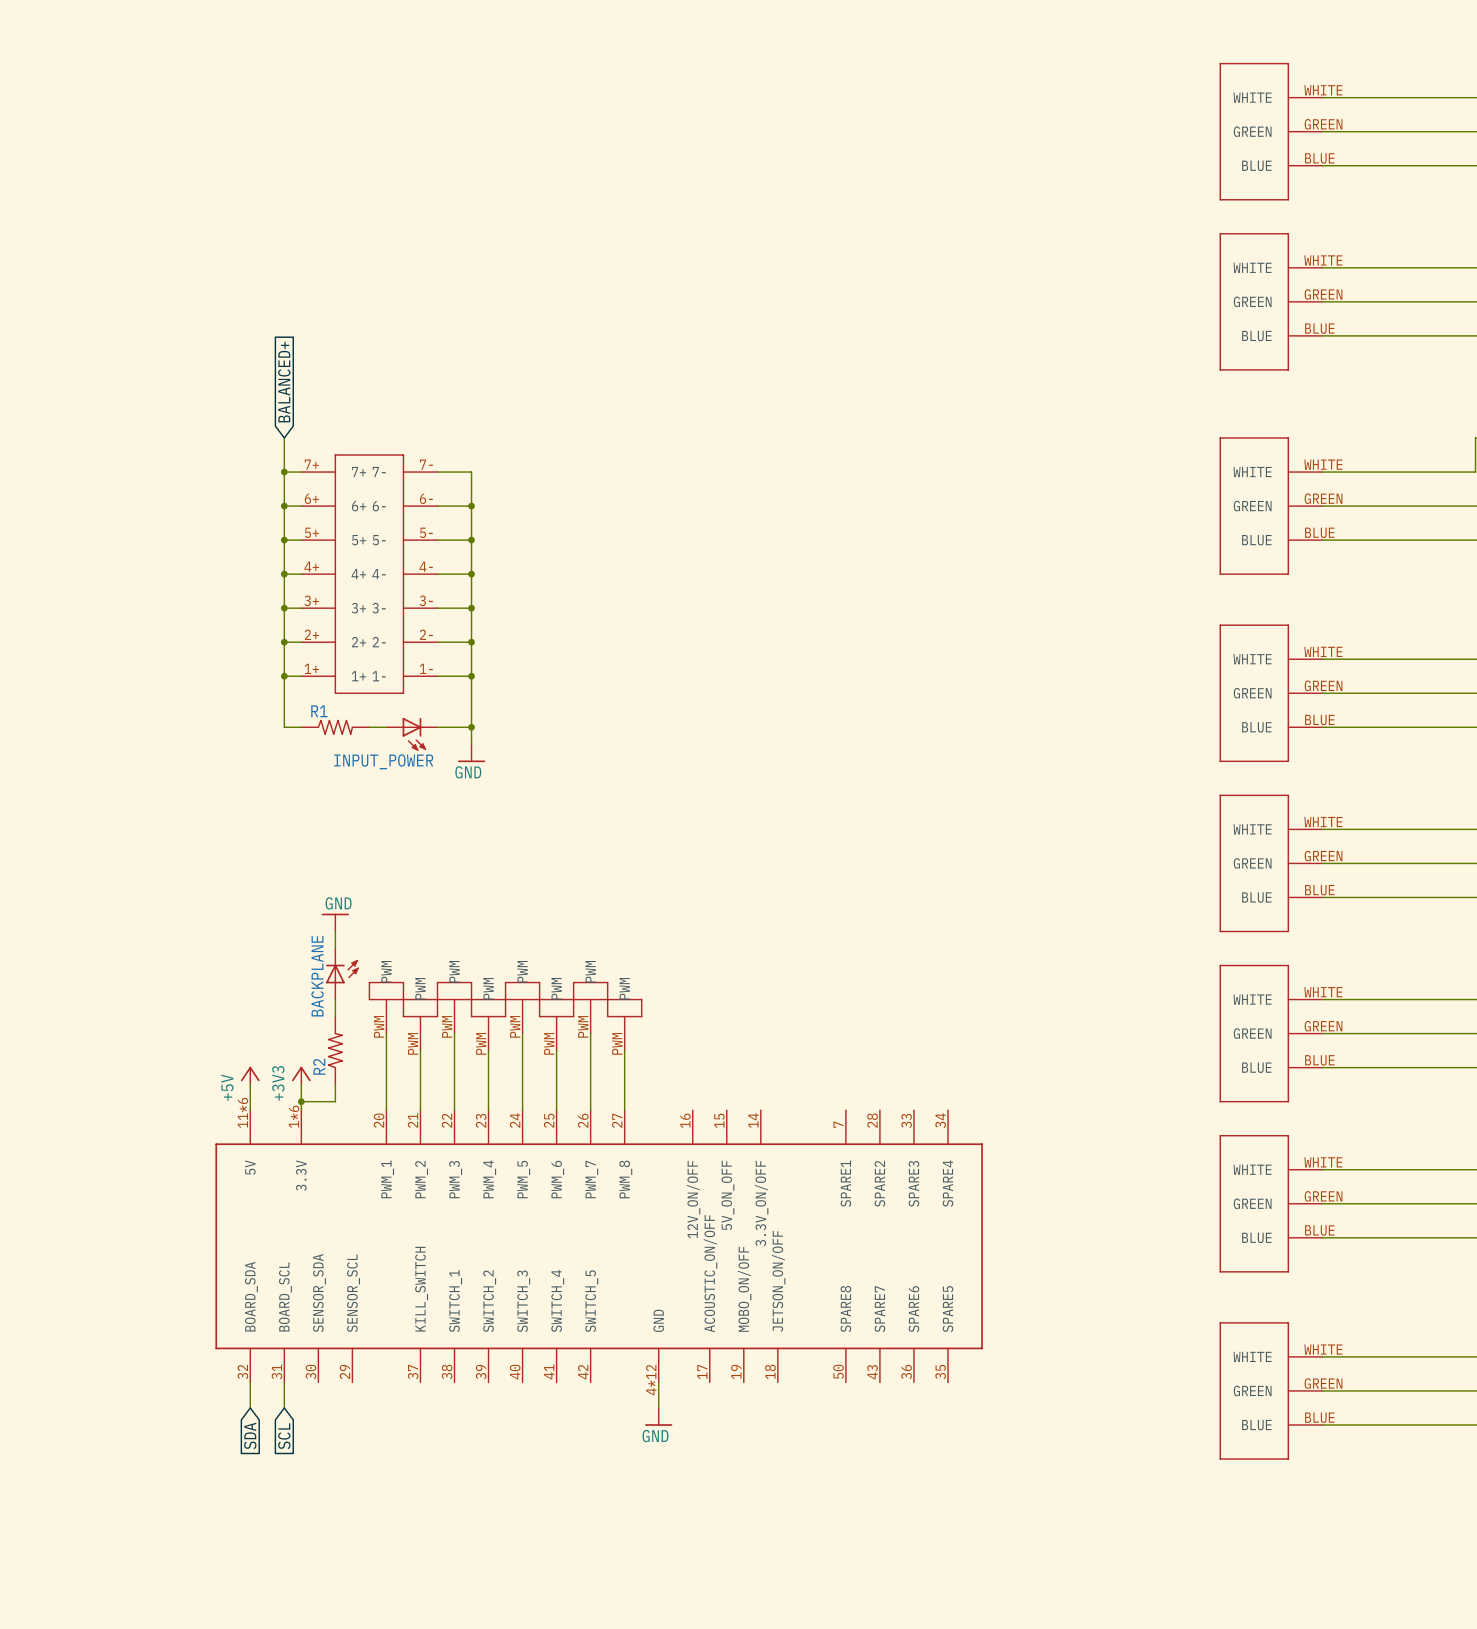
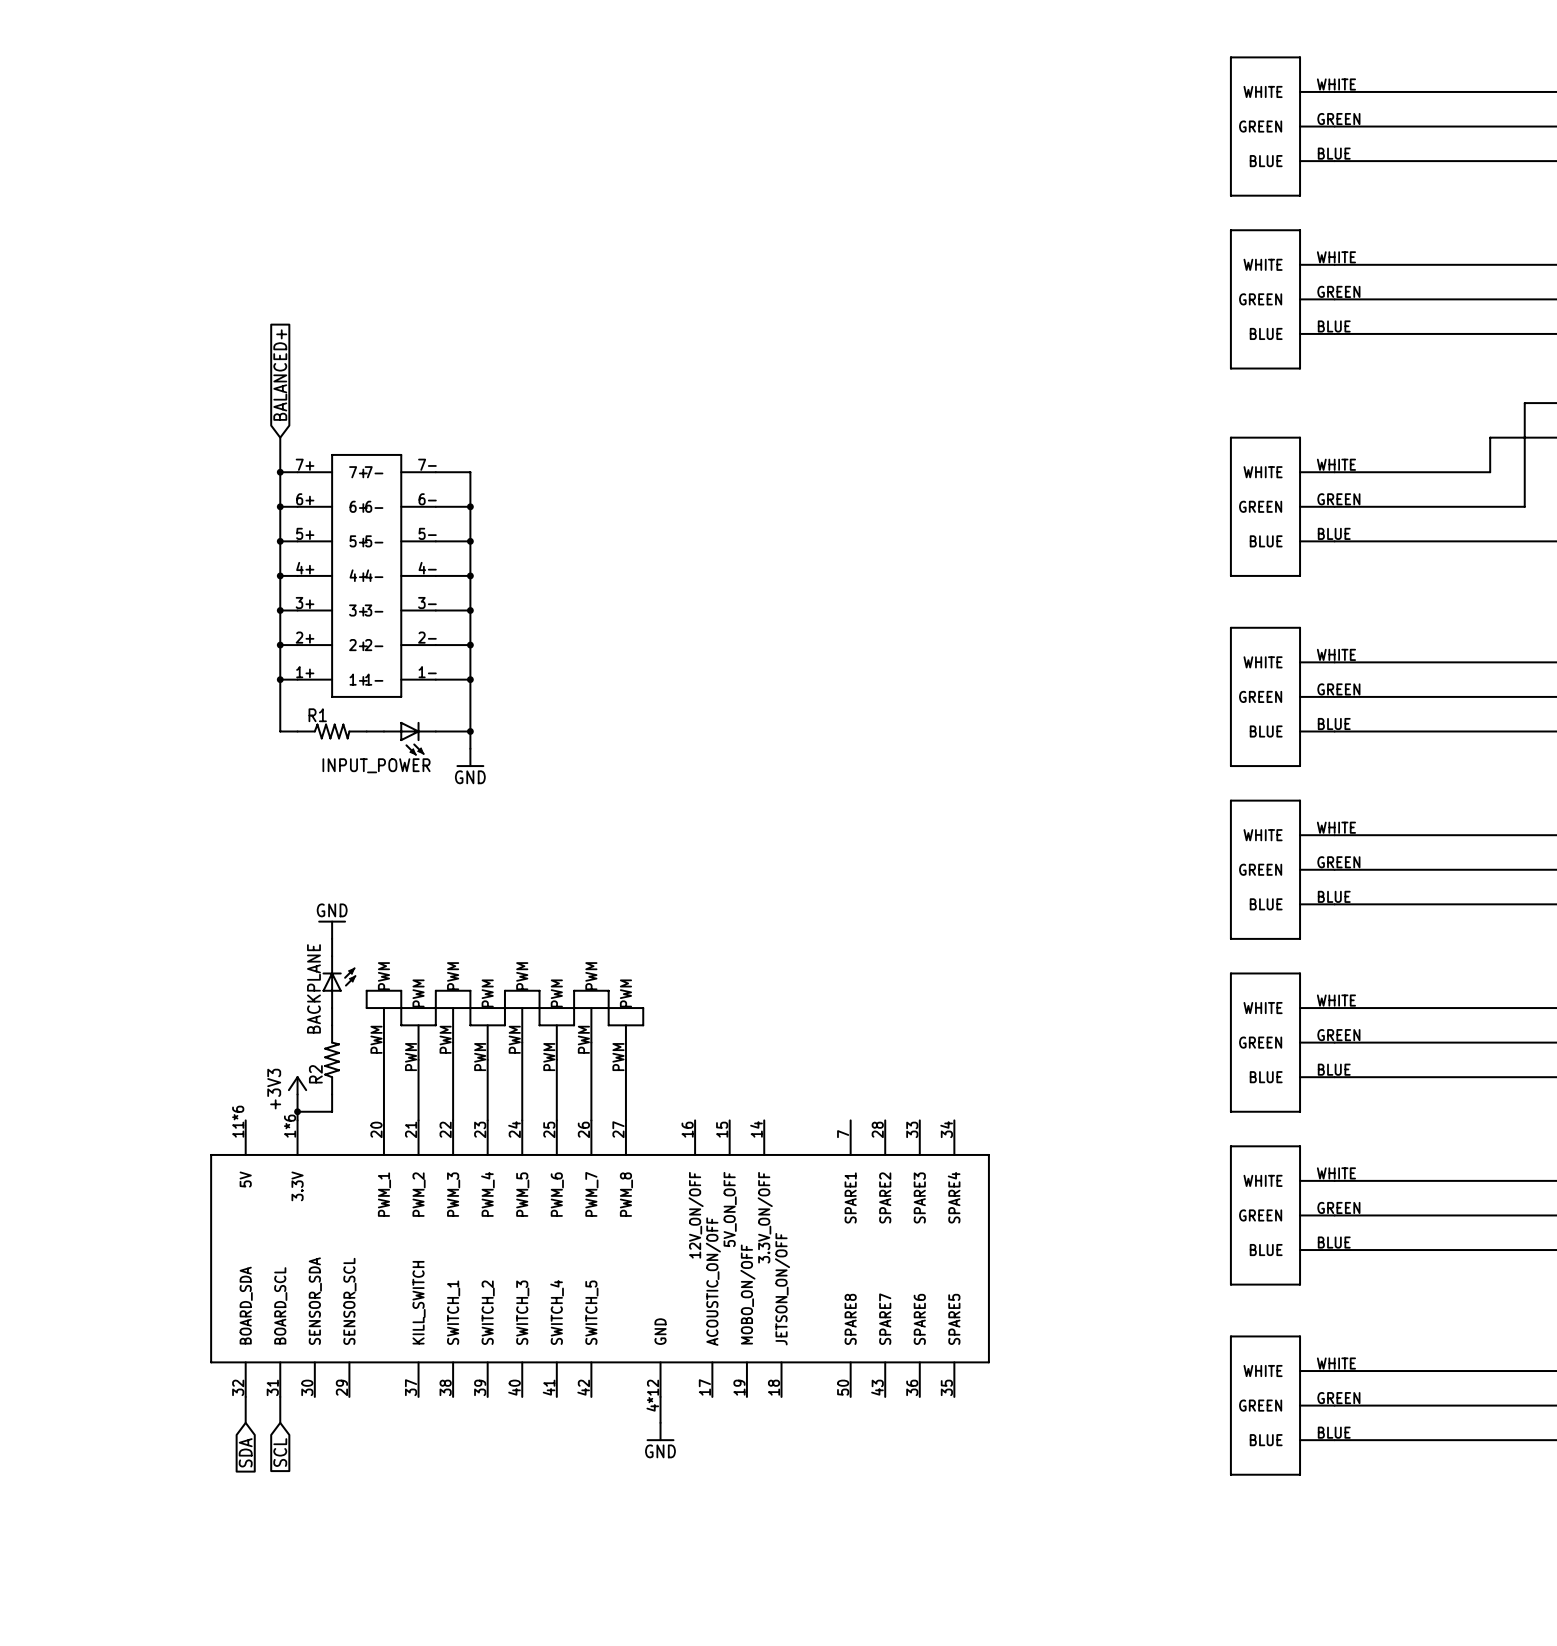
power symbol: +5V (250, 1075) -> none
wire: (250, 1084) (250, 1110) -> none

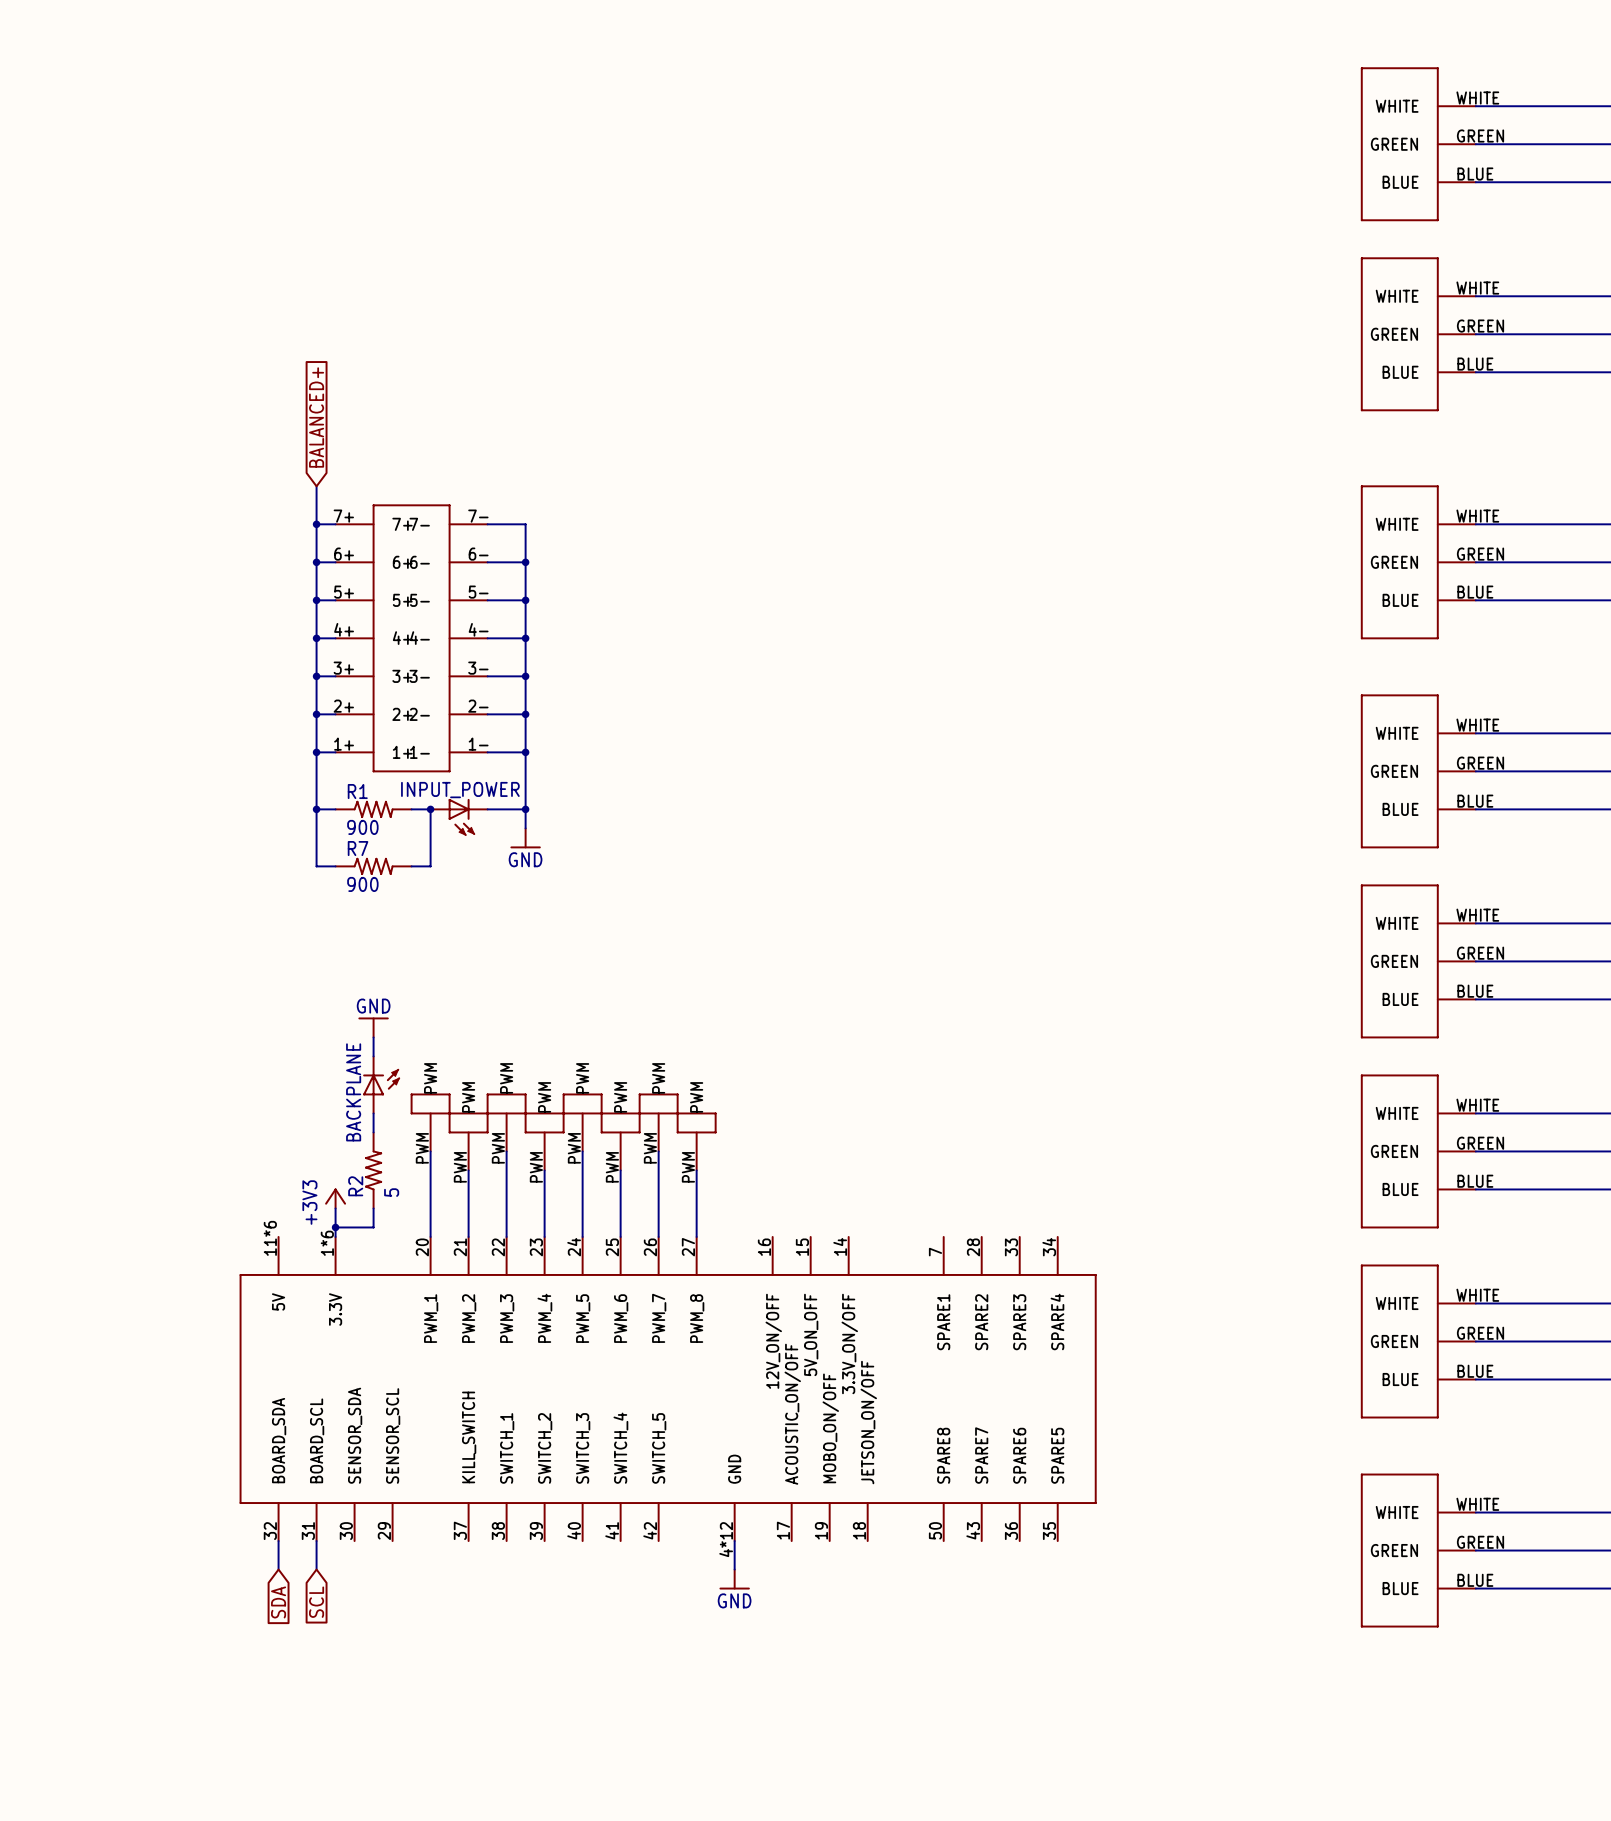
wire: none -> (316, 809) (316, 866) (335, 866)
junction: none -> (316, 809)
wire: none -> (430, 809) (430, 866) (411, 866)
junction: none -> (430, 809)
R1 value: none -> 900 (362, 827)
INPUT_POWER name position: INPUT_POWER (376, 765) -> INPUT_POWER (460, 790)
R7: none -> 900 (373, 866)
R2 value: none -> 5 (391, 1192)

